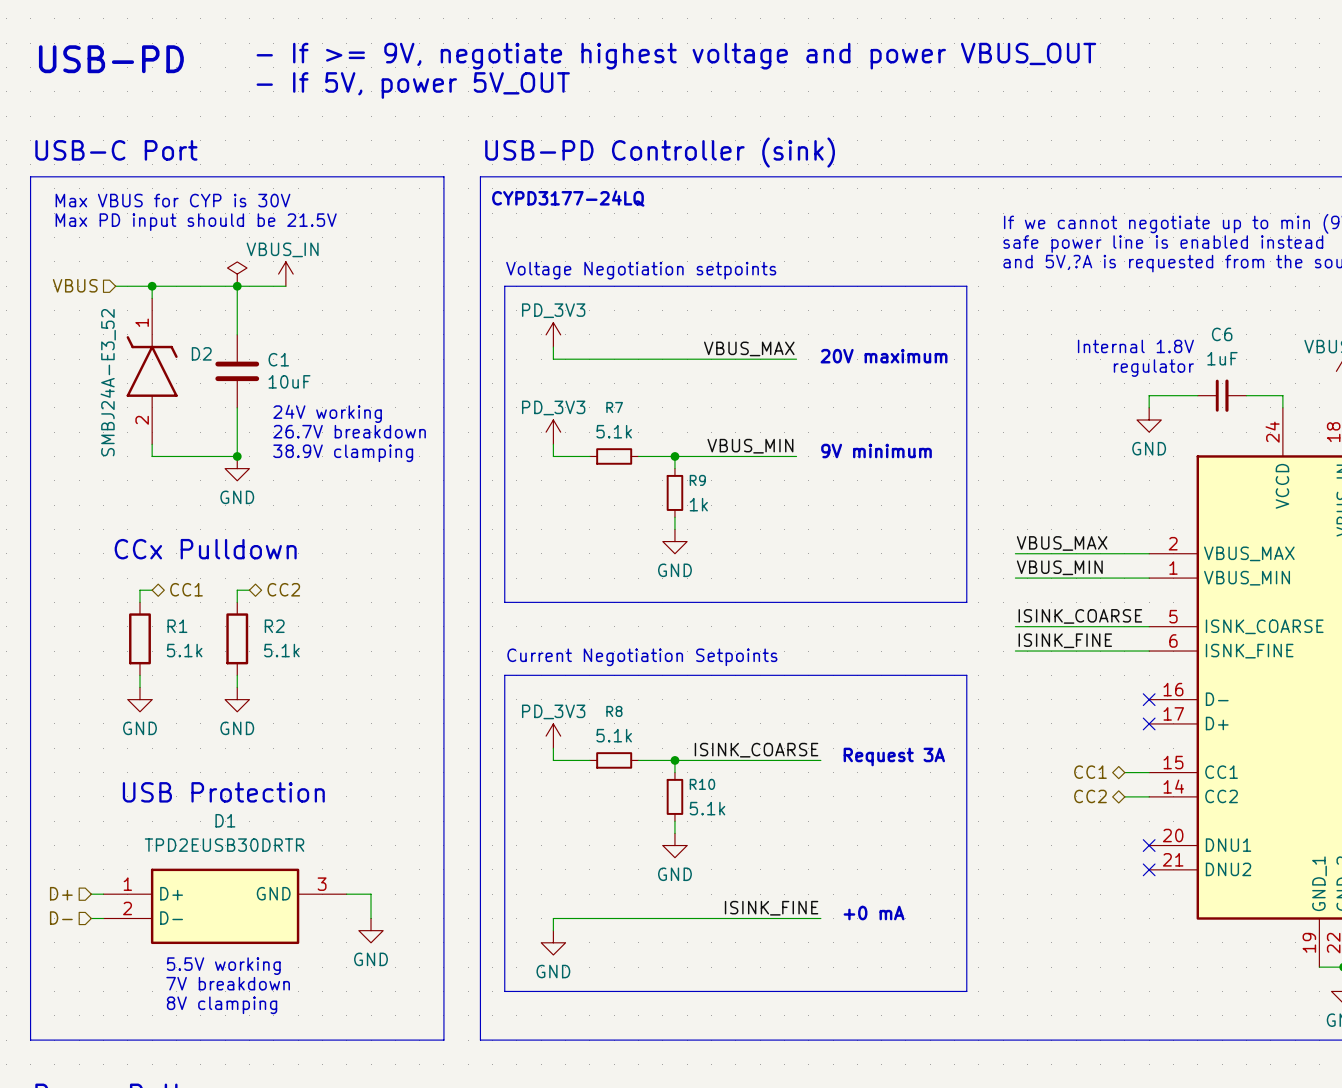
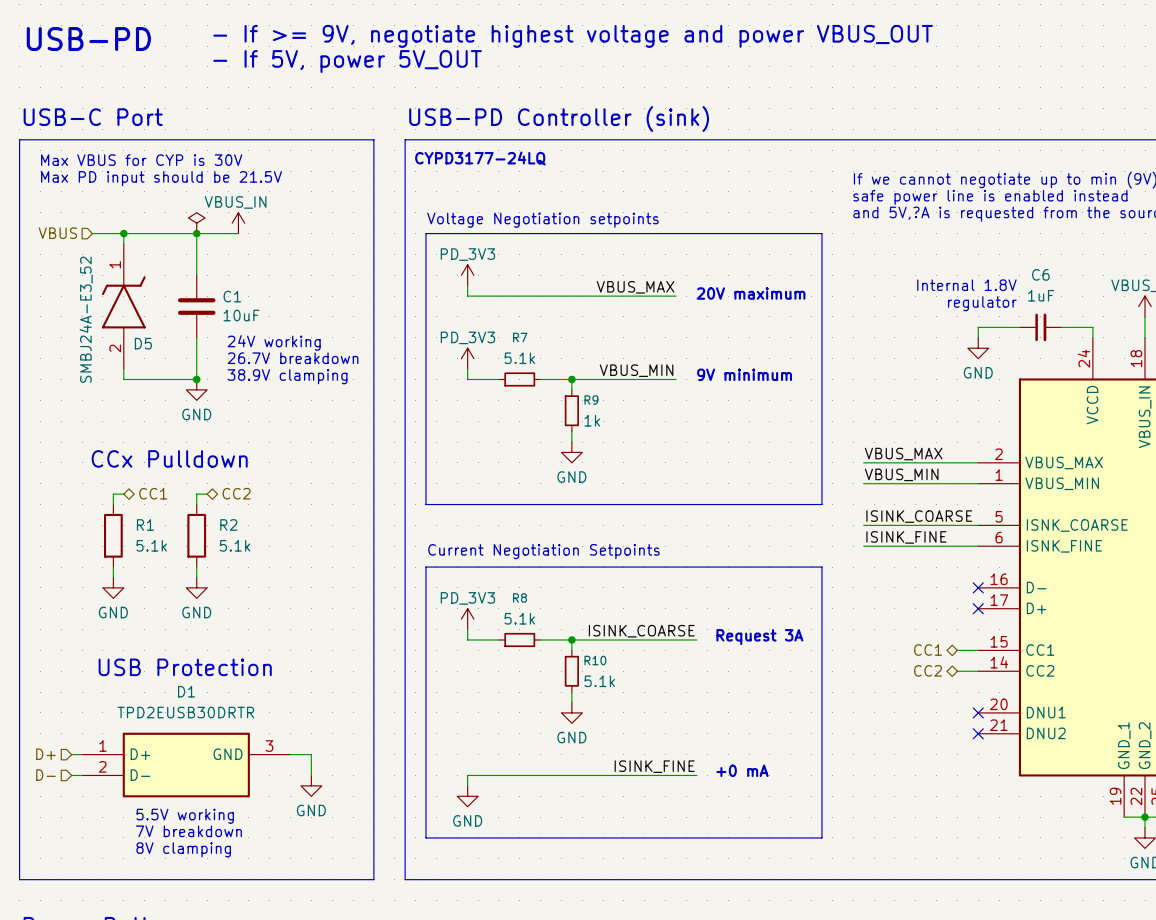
D2: SMBJ24A-E3_52 (152, 371) -> none
D5: none -> SMBJ24A-E3_52 (123, 306)

